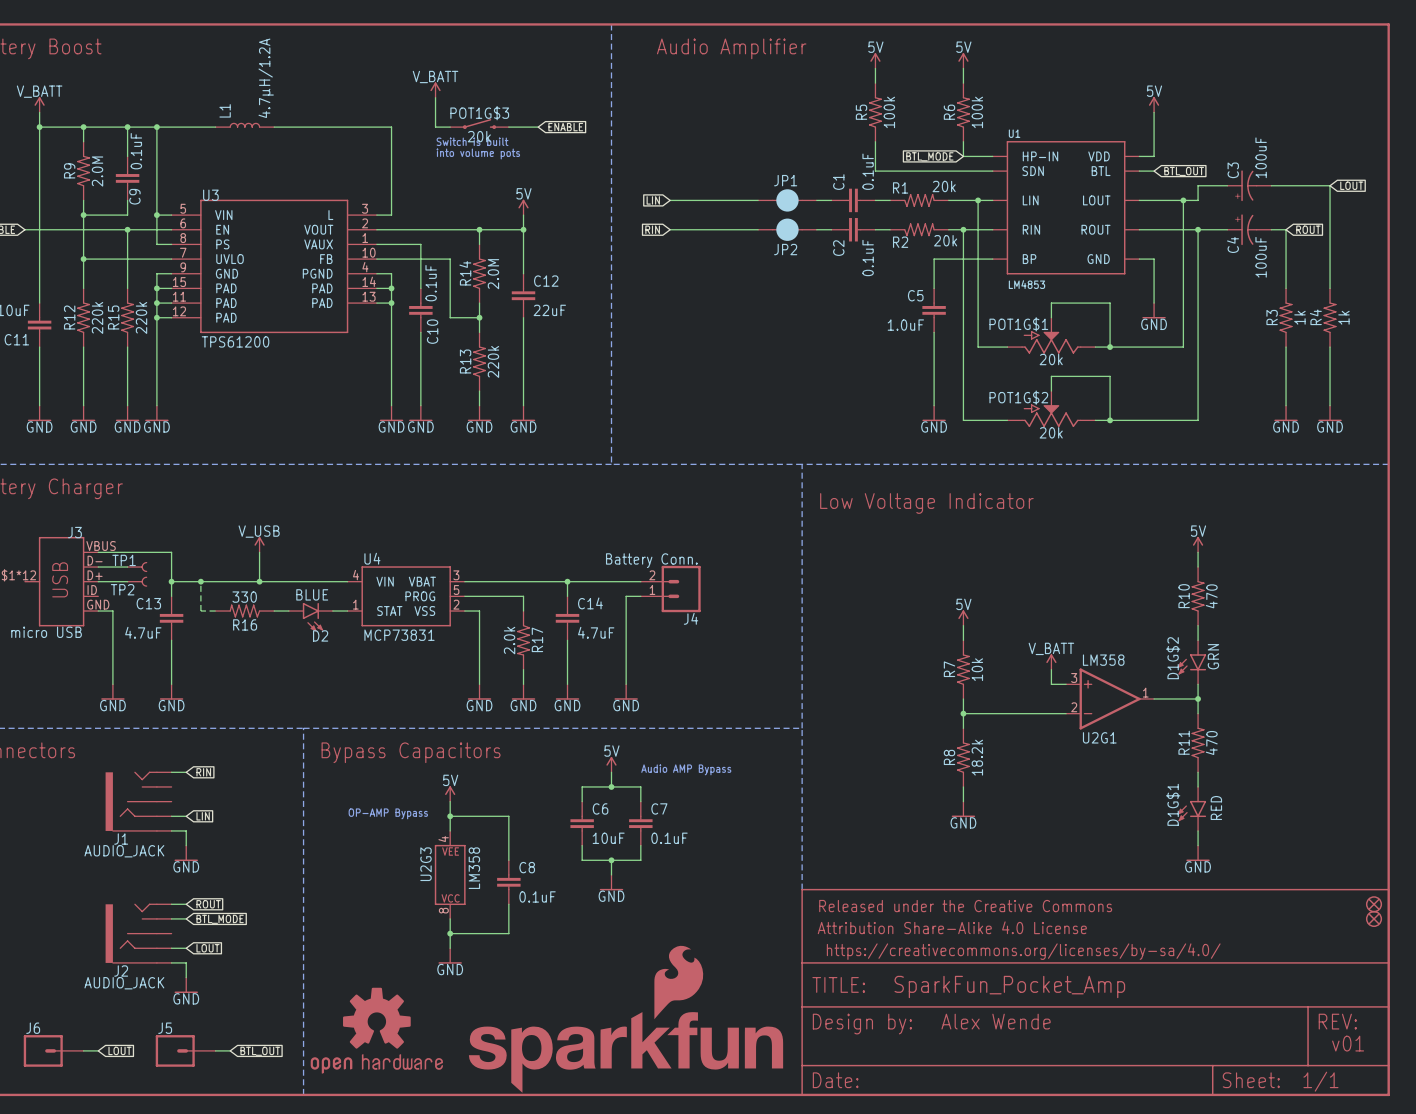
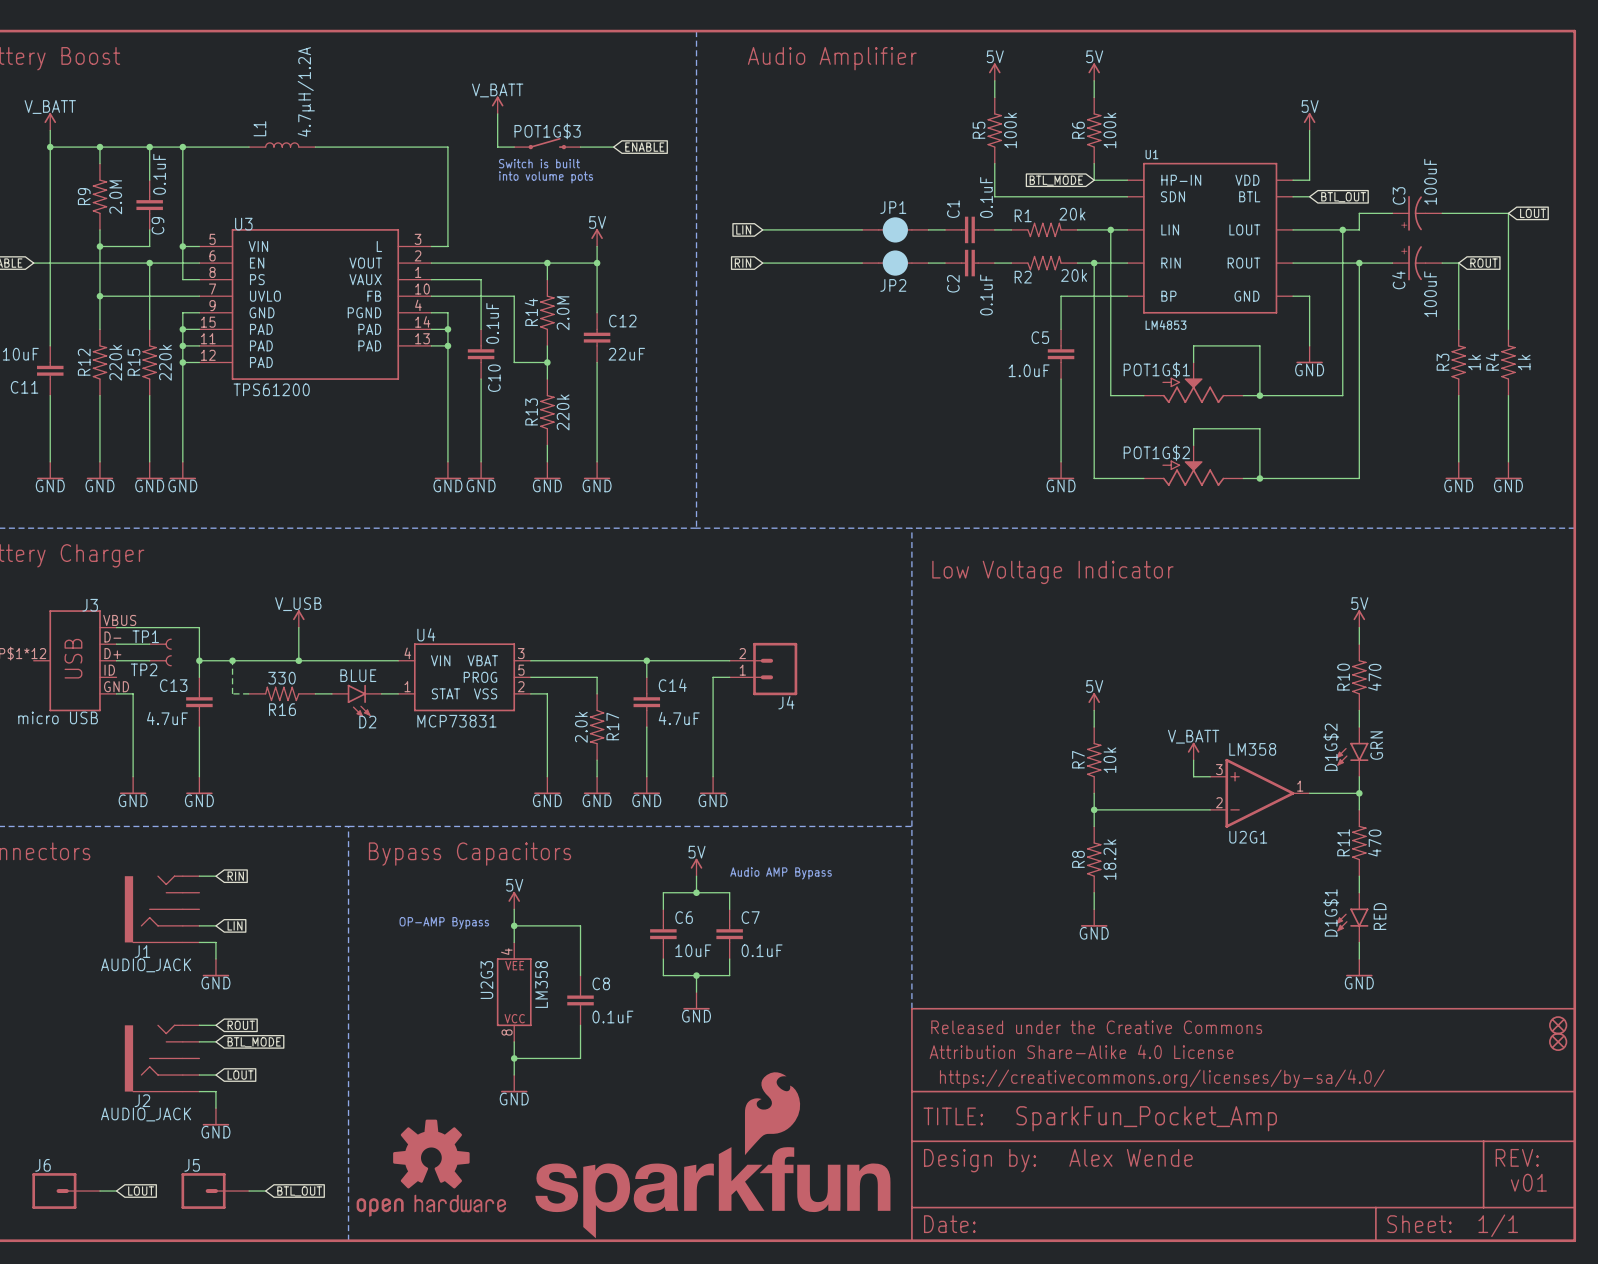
POT1G$3 value: 20k (479, 136) -> none
POT1G$1 value: 20k (1051, 359) -> none
POT1G$2 value: 20k (1051, 432) -> none
J4 value: Battery Conn. (651, 560) -> none

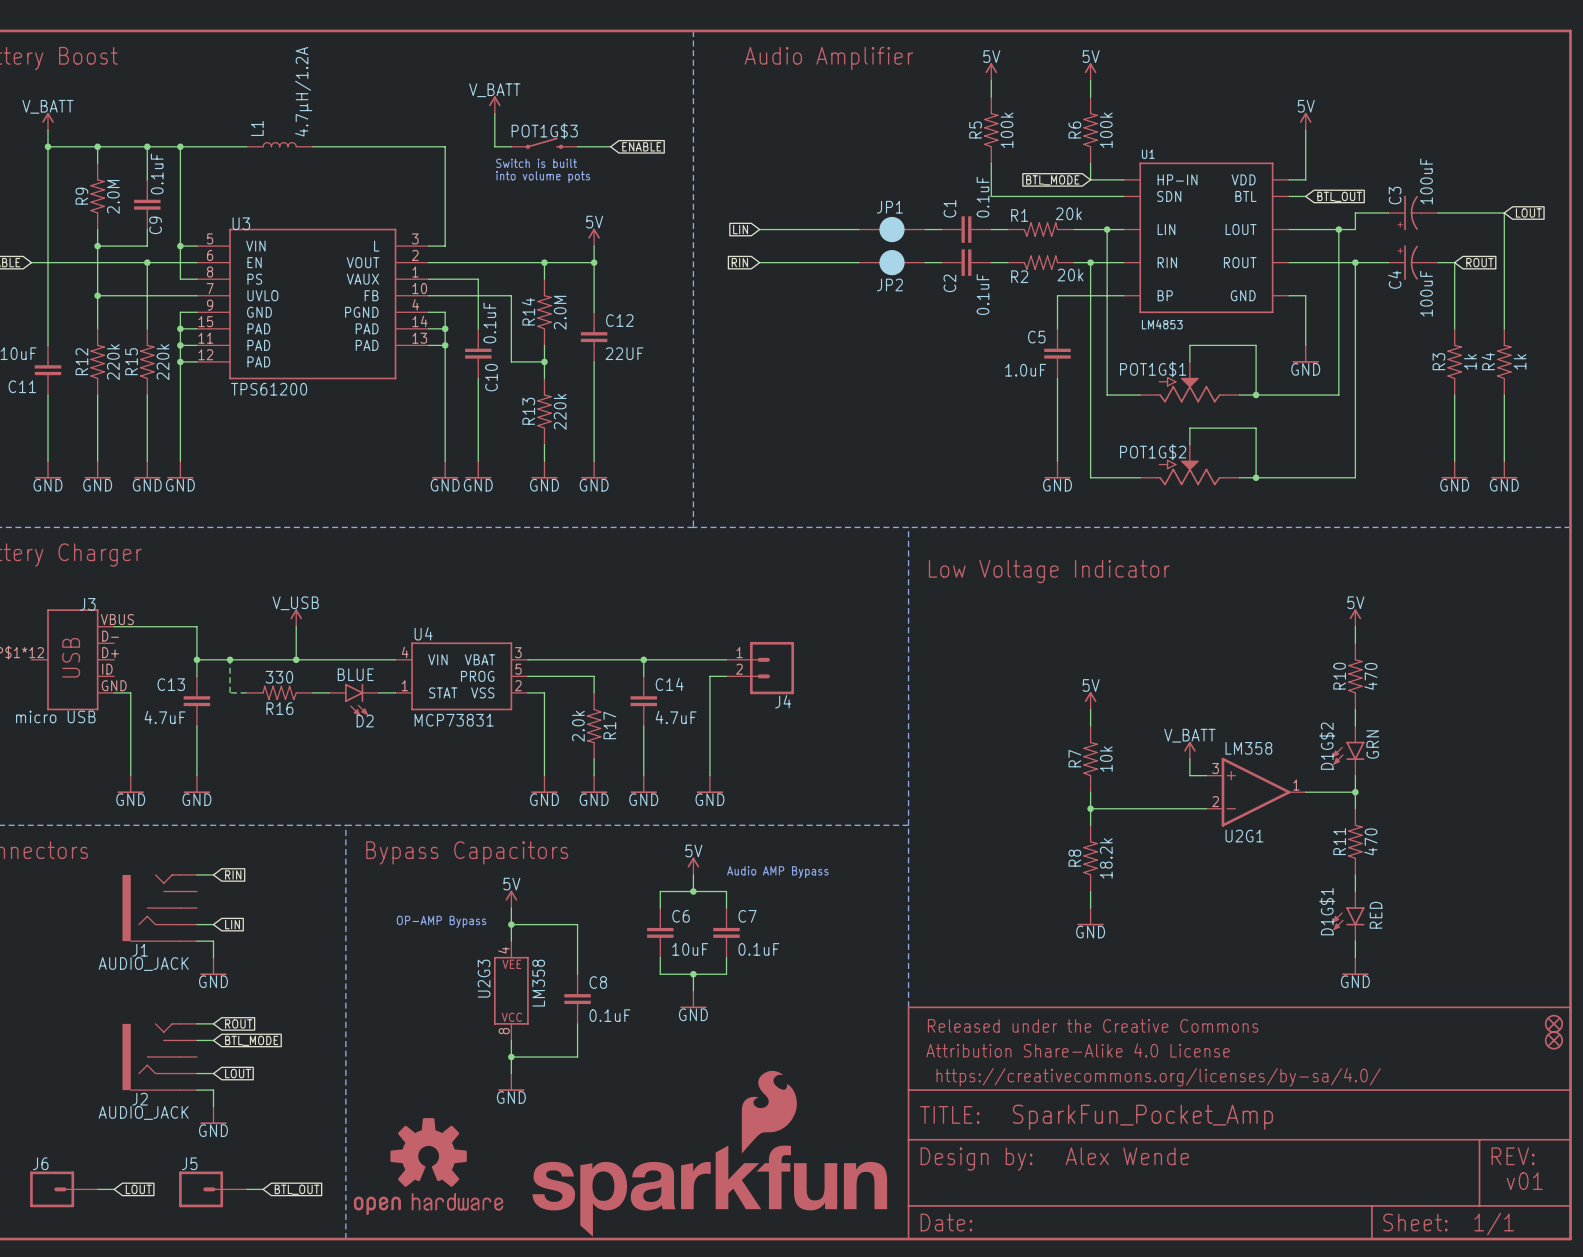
C12 value: 22uF (626, 354) -> 22UF (624, 353)
wire: (116, 644) (149, 644) -> none
TP1: (160, 644) -> none
wire: (116, 660) (149, 660) -> none
TP2: (160, 660) -> none
J4 flip: as is (775, 669) -> up-down (772, 668)

